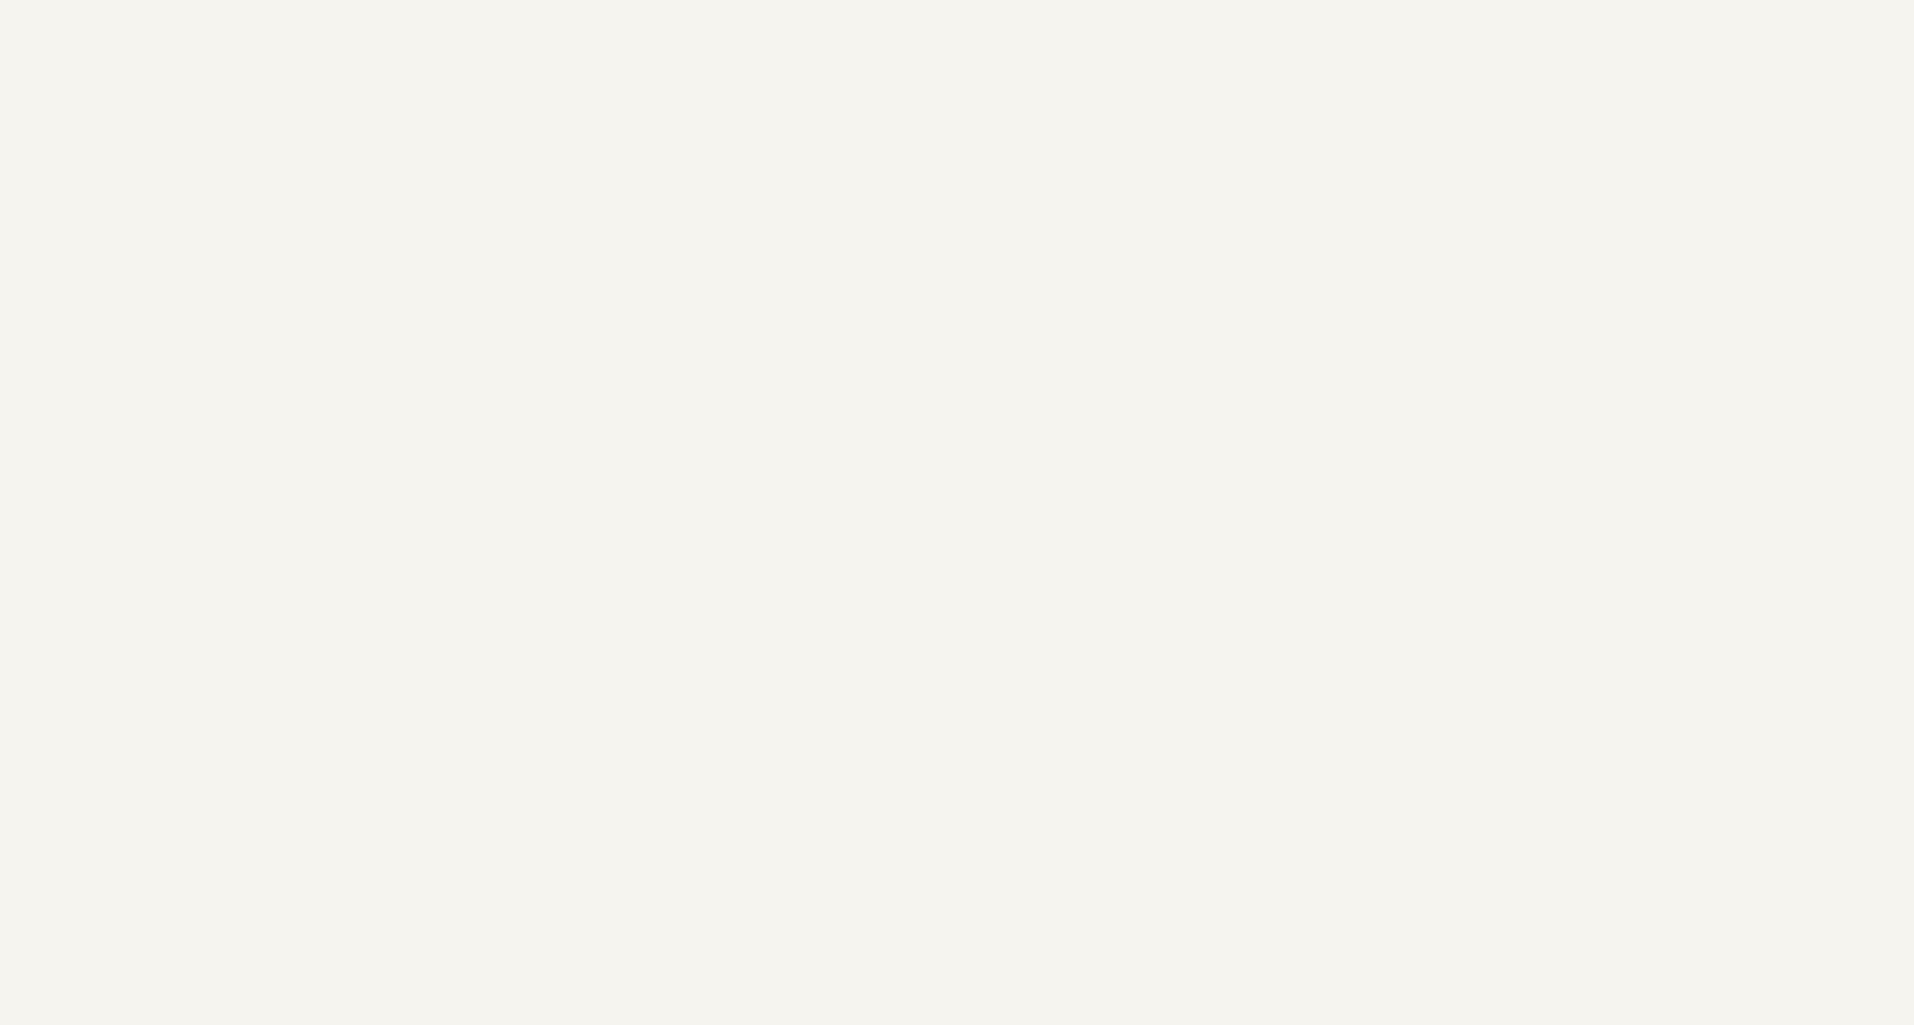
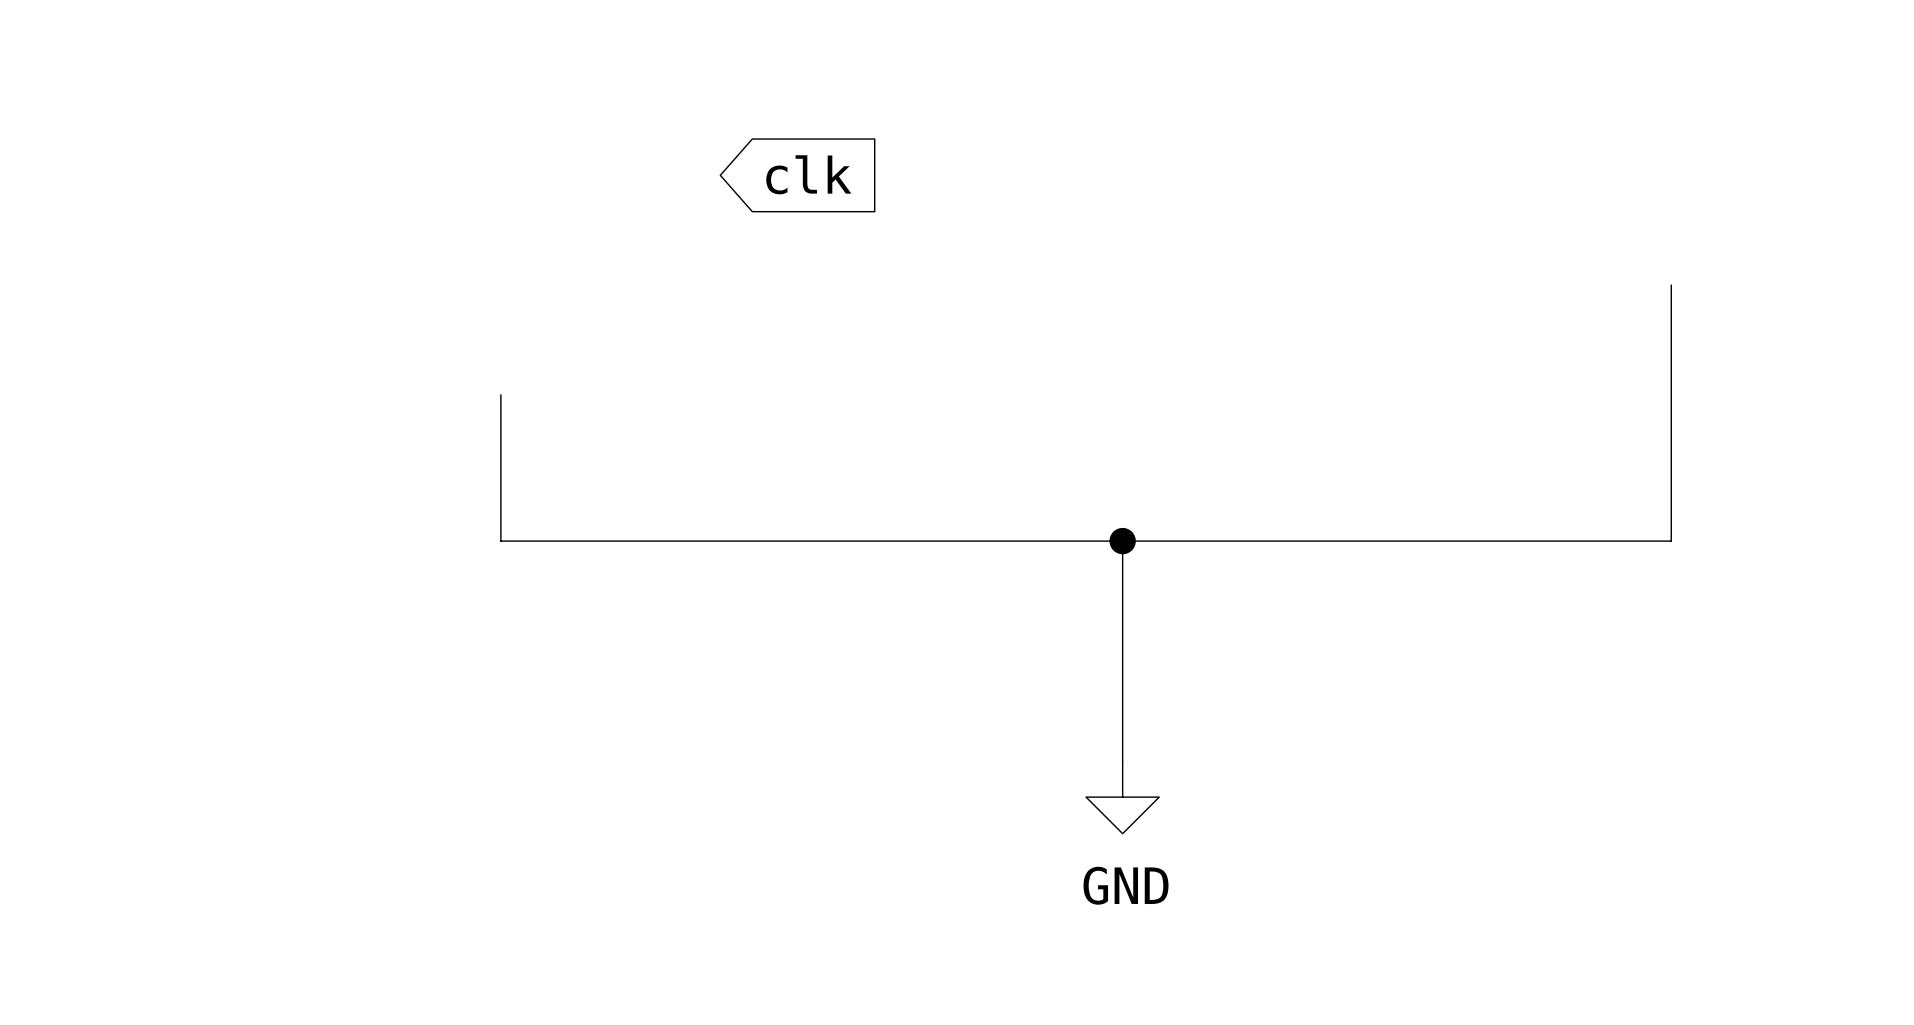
global label: none -> clk (808, 174)
wire: none -> (1671, 285) (1671, 541) (500, 541) (500, 394)
wire: none -> (1122, 541) (1122, 760)
junction: none -> (1122, 541)
power symbol: none -> GND (1122, 797)

